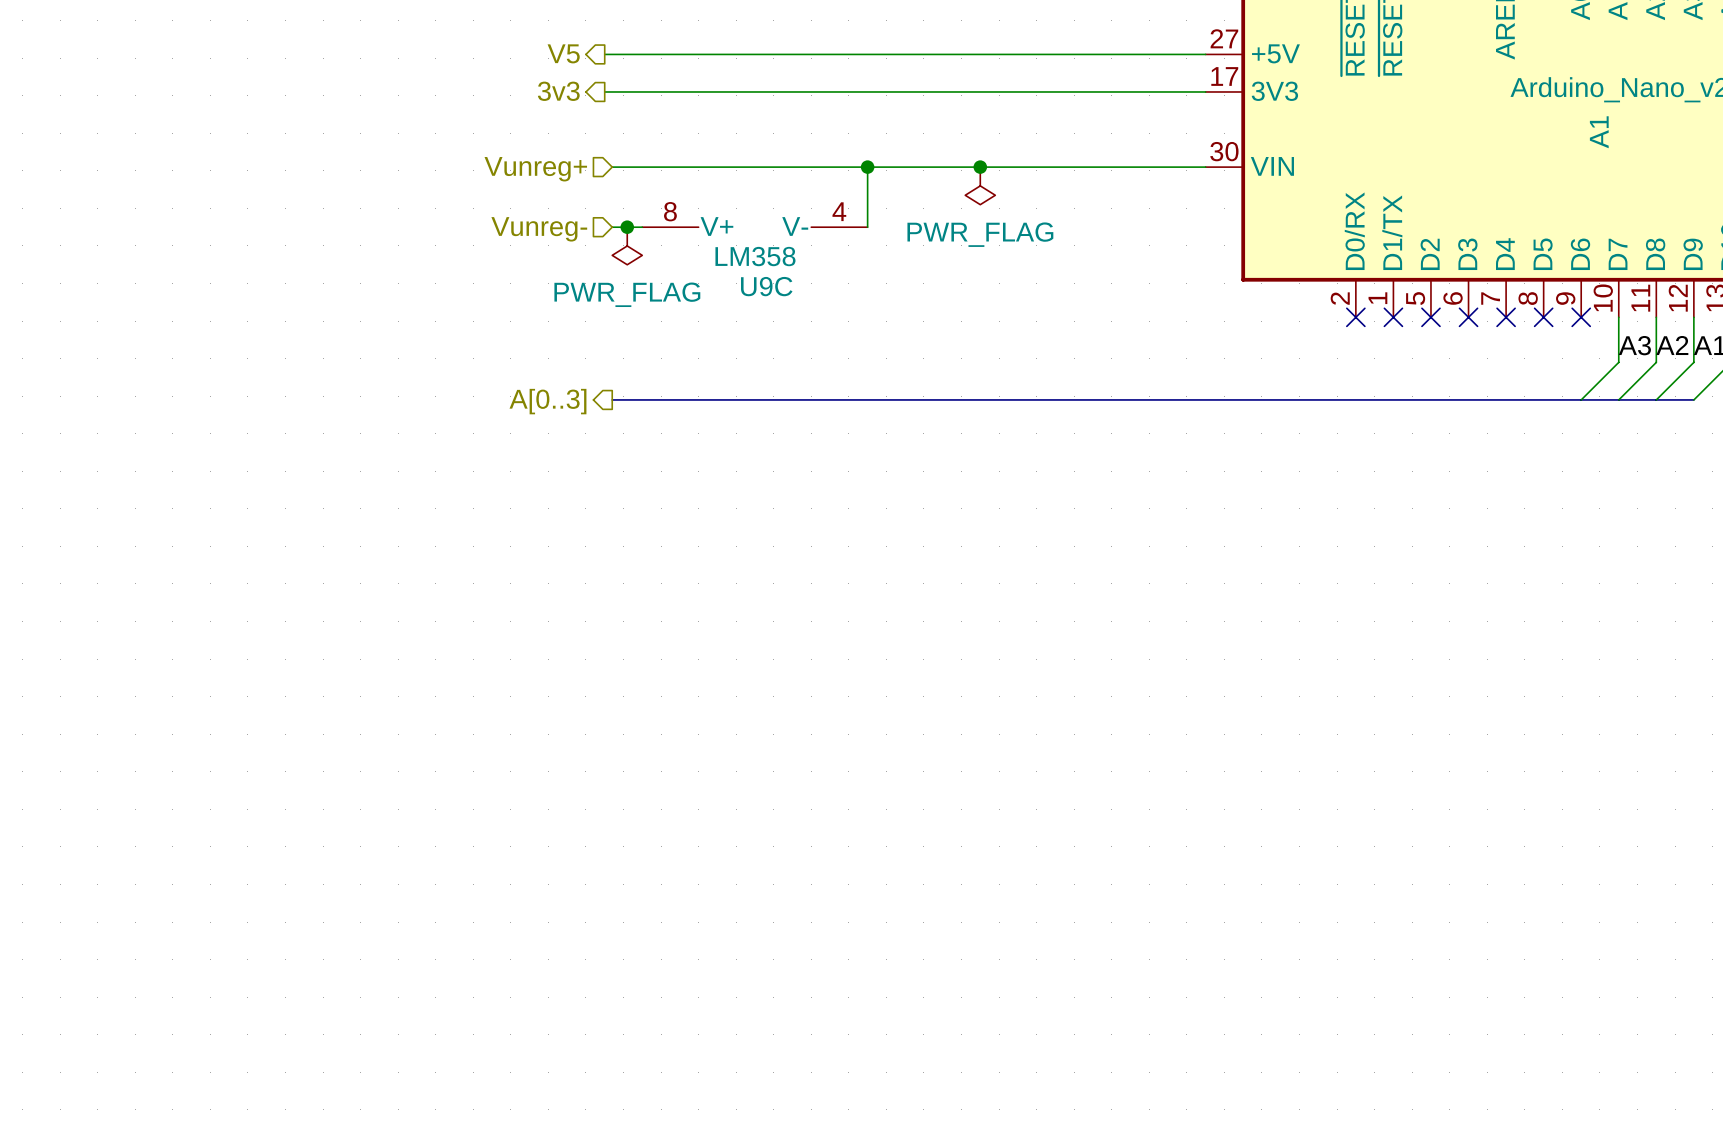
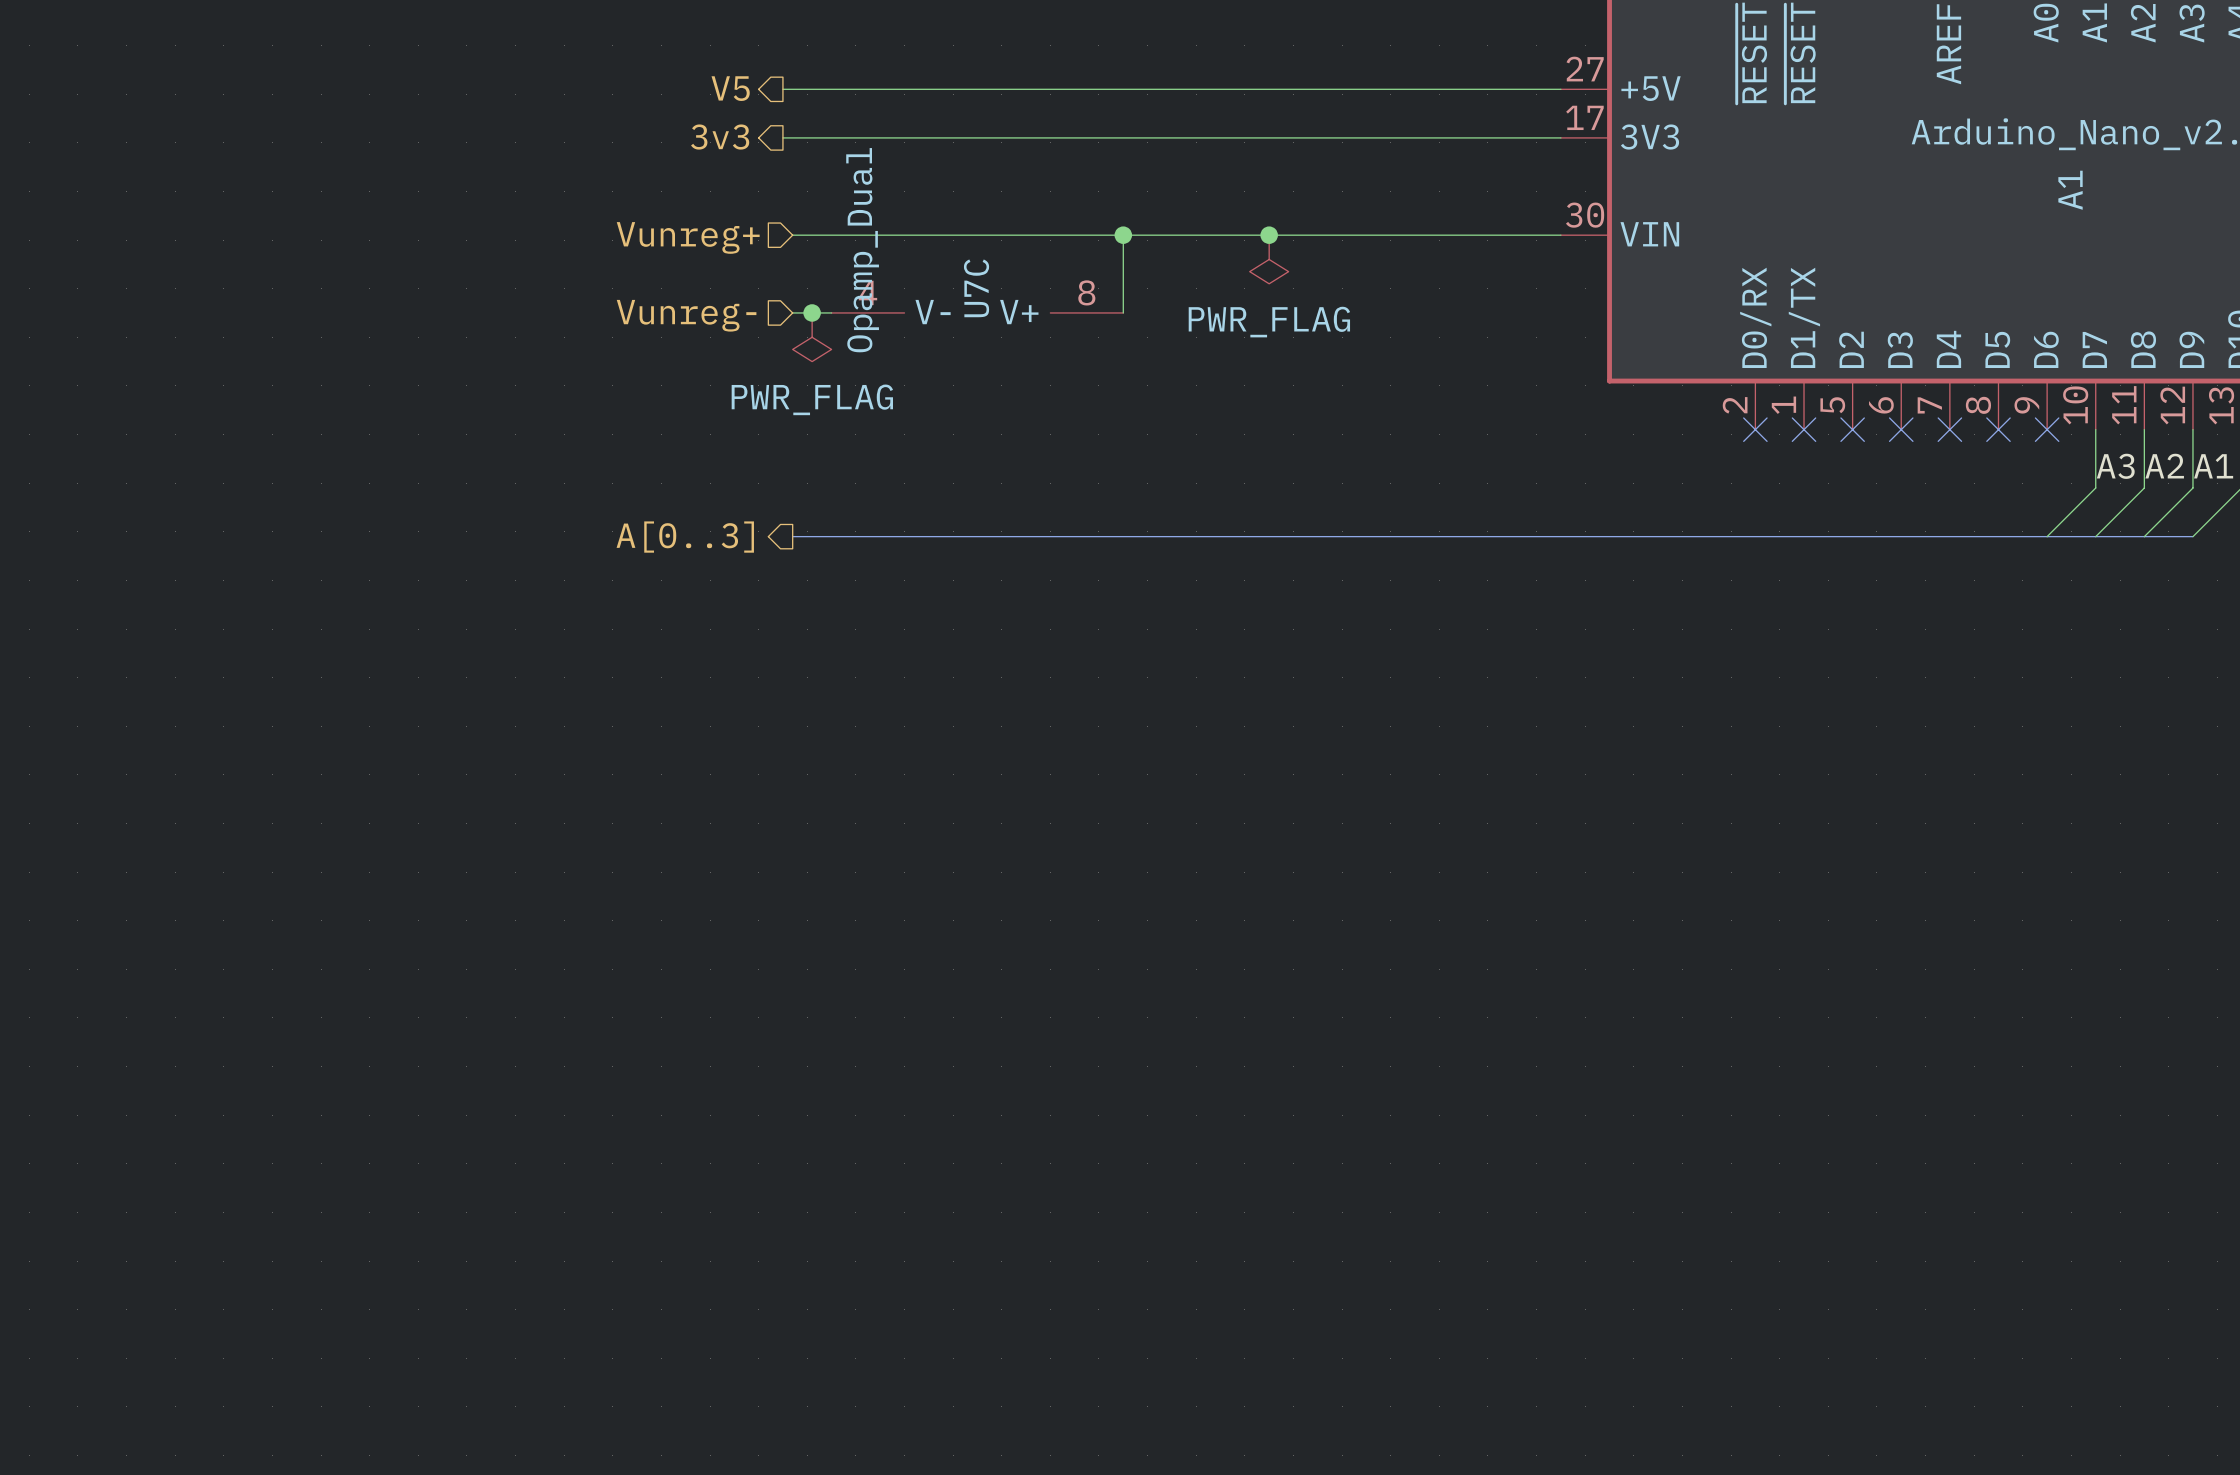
U9C rotation: 0° (754, 227) -> 180° (977, 312)
U9C value: LM358 (755, 256) -> Opamp_Dual (862, 250)
U9C name: U9C (766, 286) -> U7C (976, 288)

